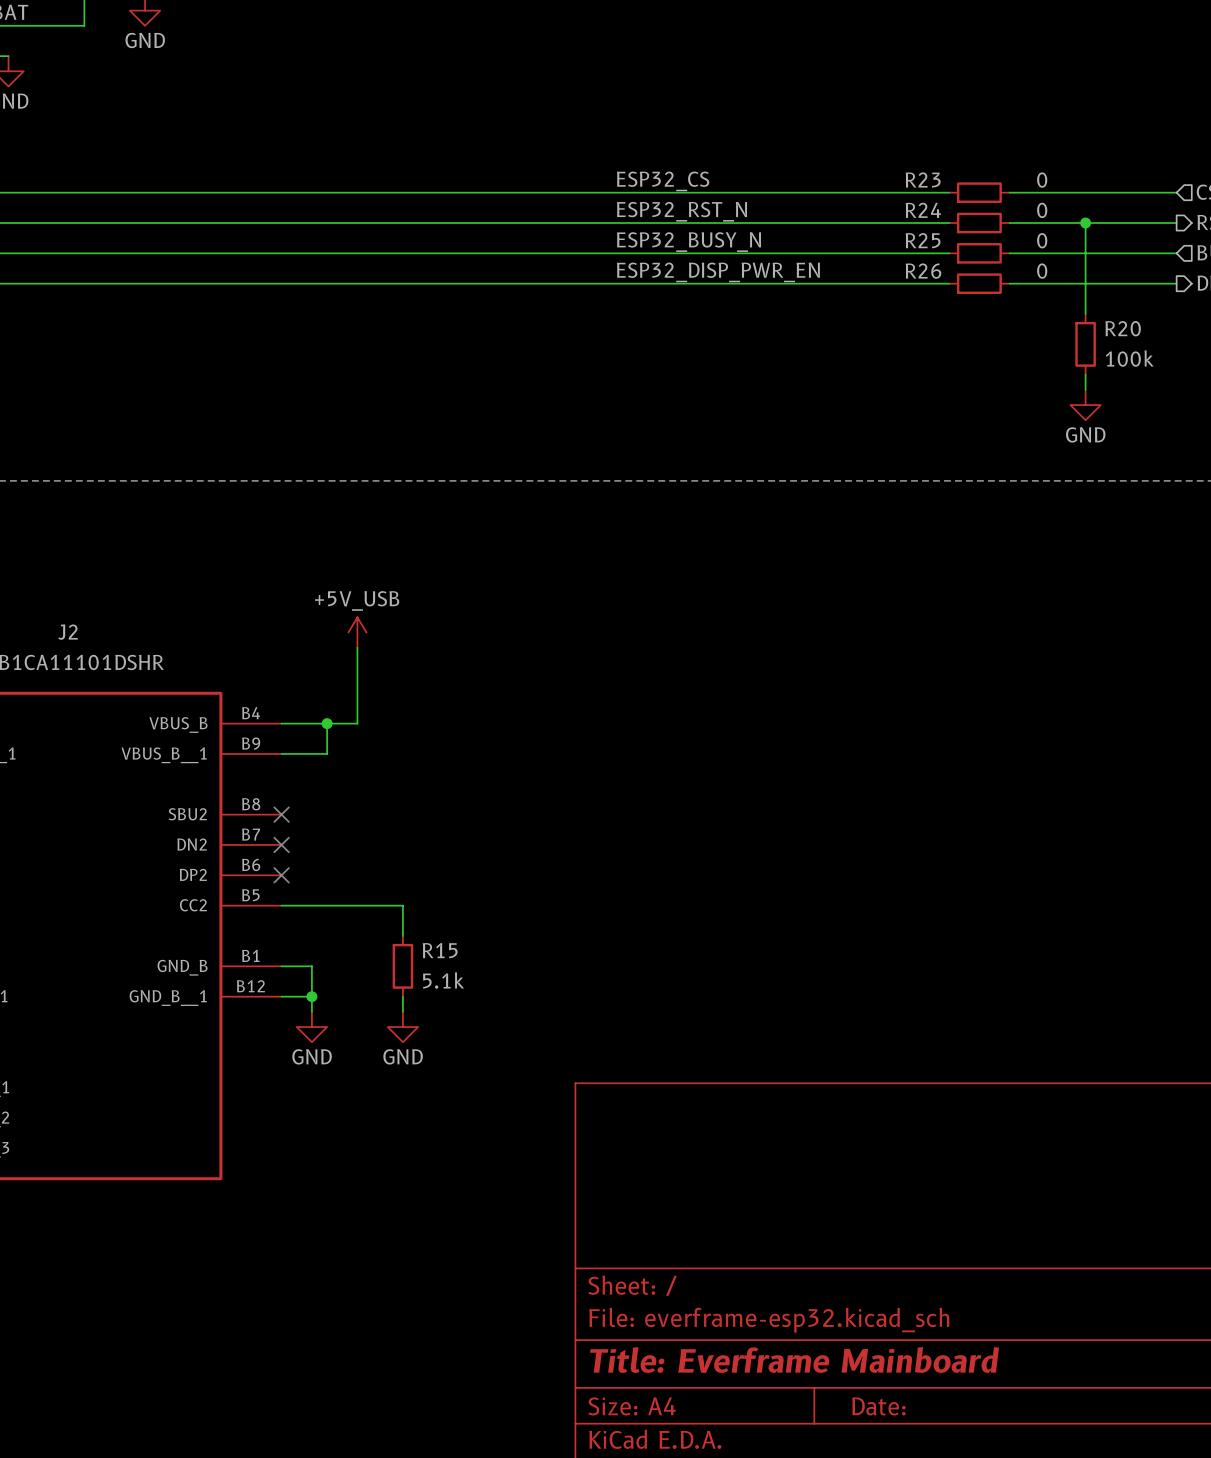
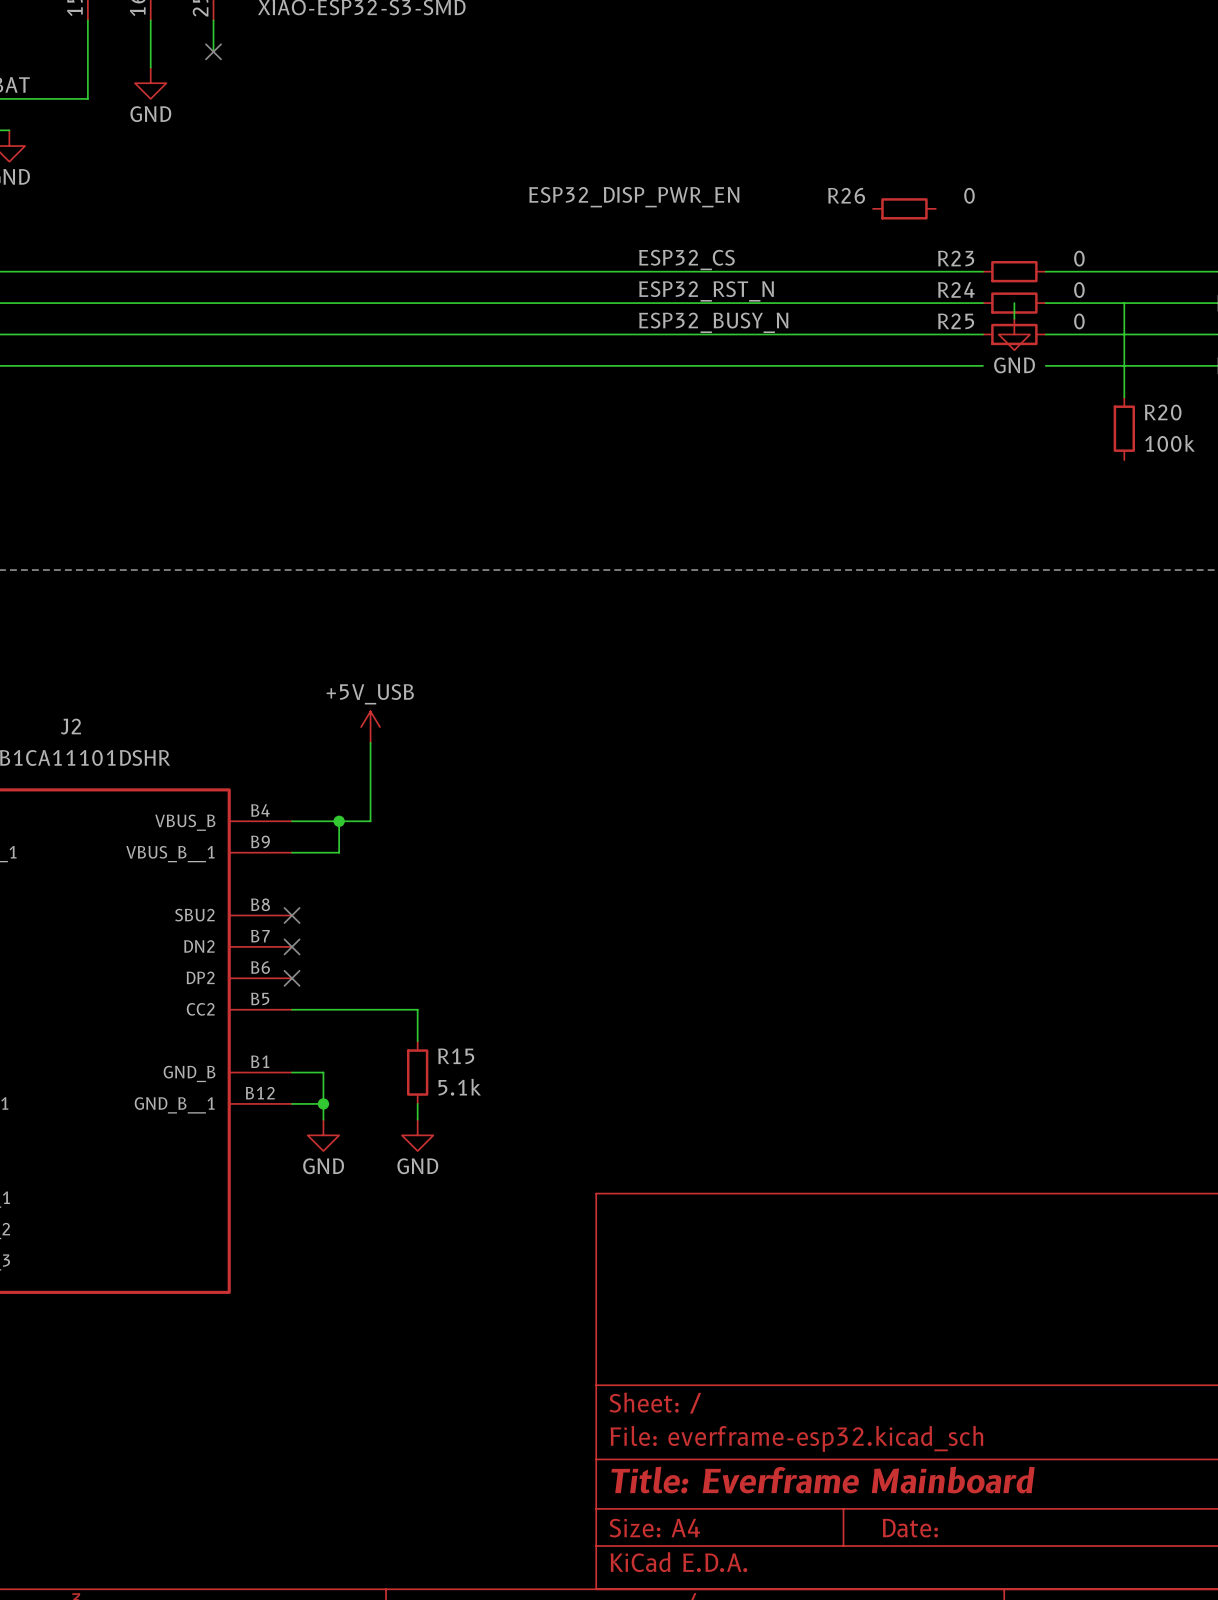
junction: (1085, 223) -> none
label position: ESP32_DISP_PWR_EN (718, 272) -> ESP32_DISP_PWR_EN (634, 197)
R26 position: (979, 283) -> (904, 208)
wire: (1085, 374) (1085, 389) -> (1014, 303) (1014, 318)
power symbol position: GND (1085, 405) -> GND (1014, 334)

